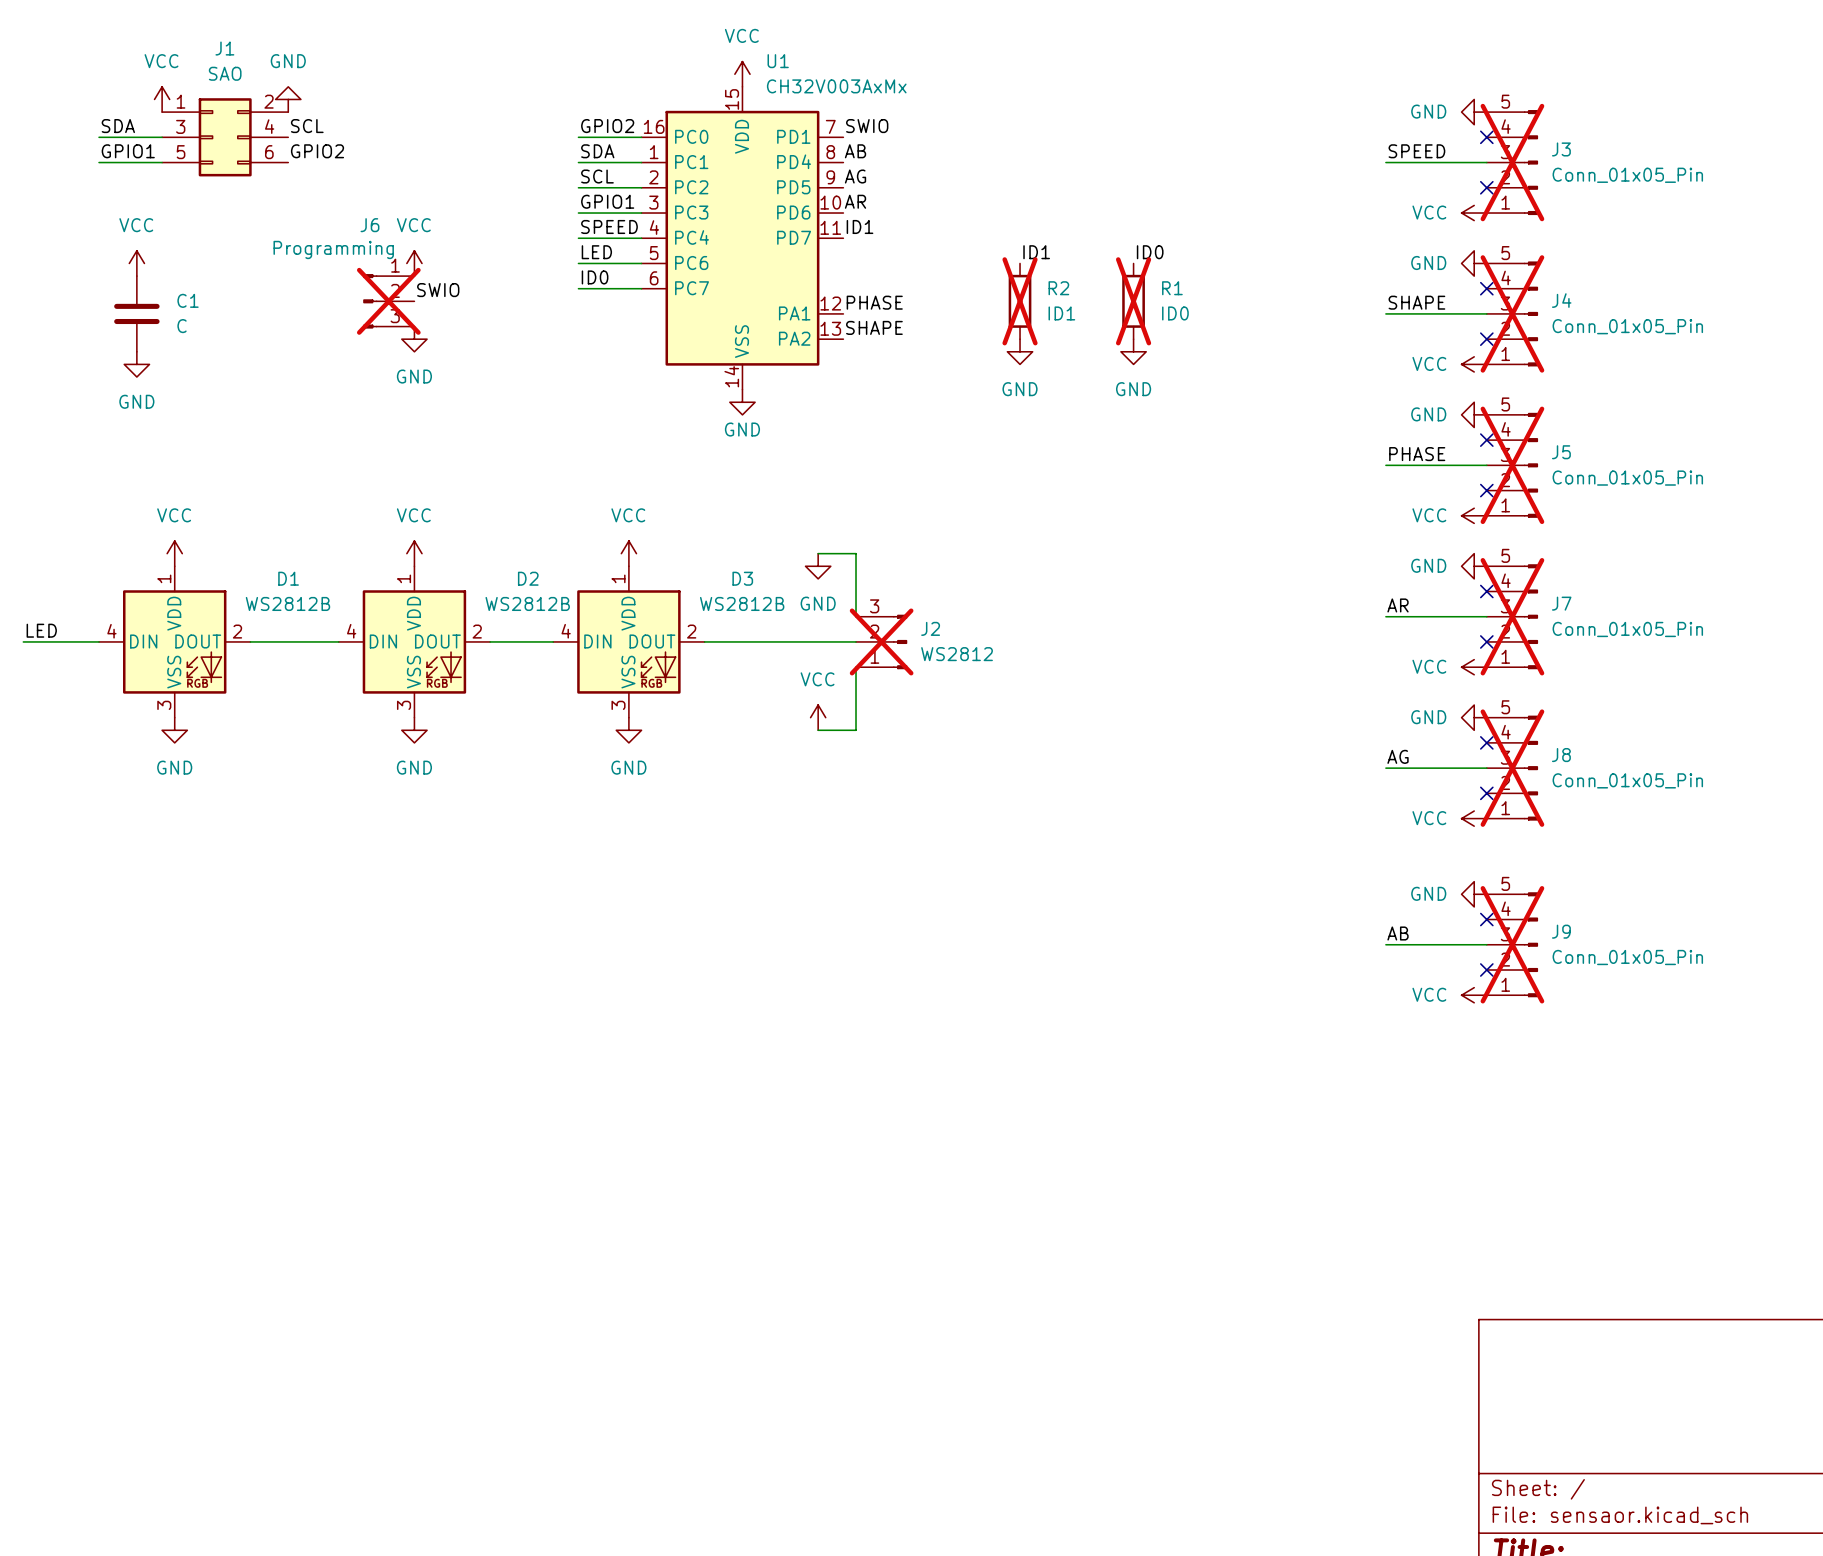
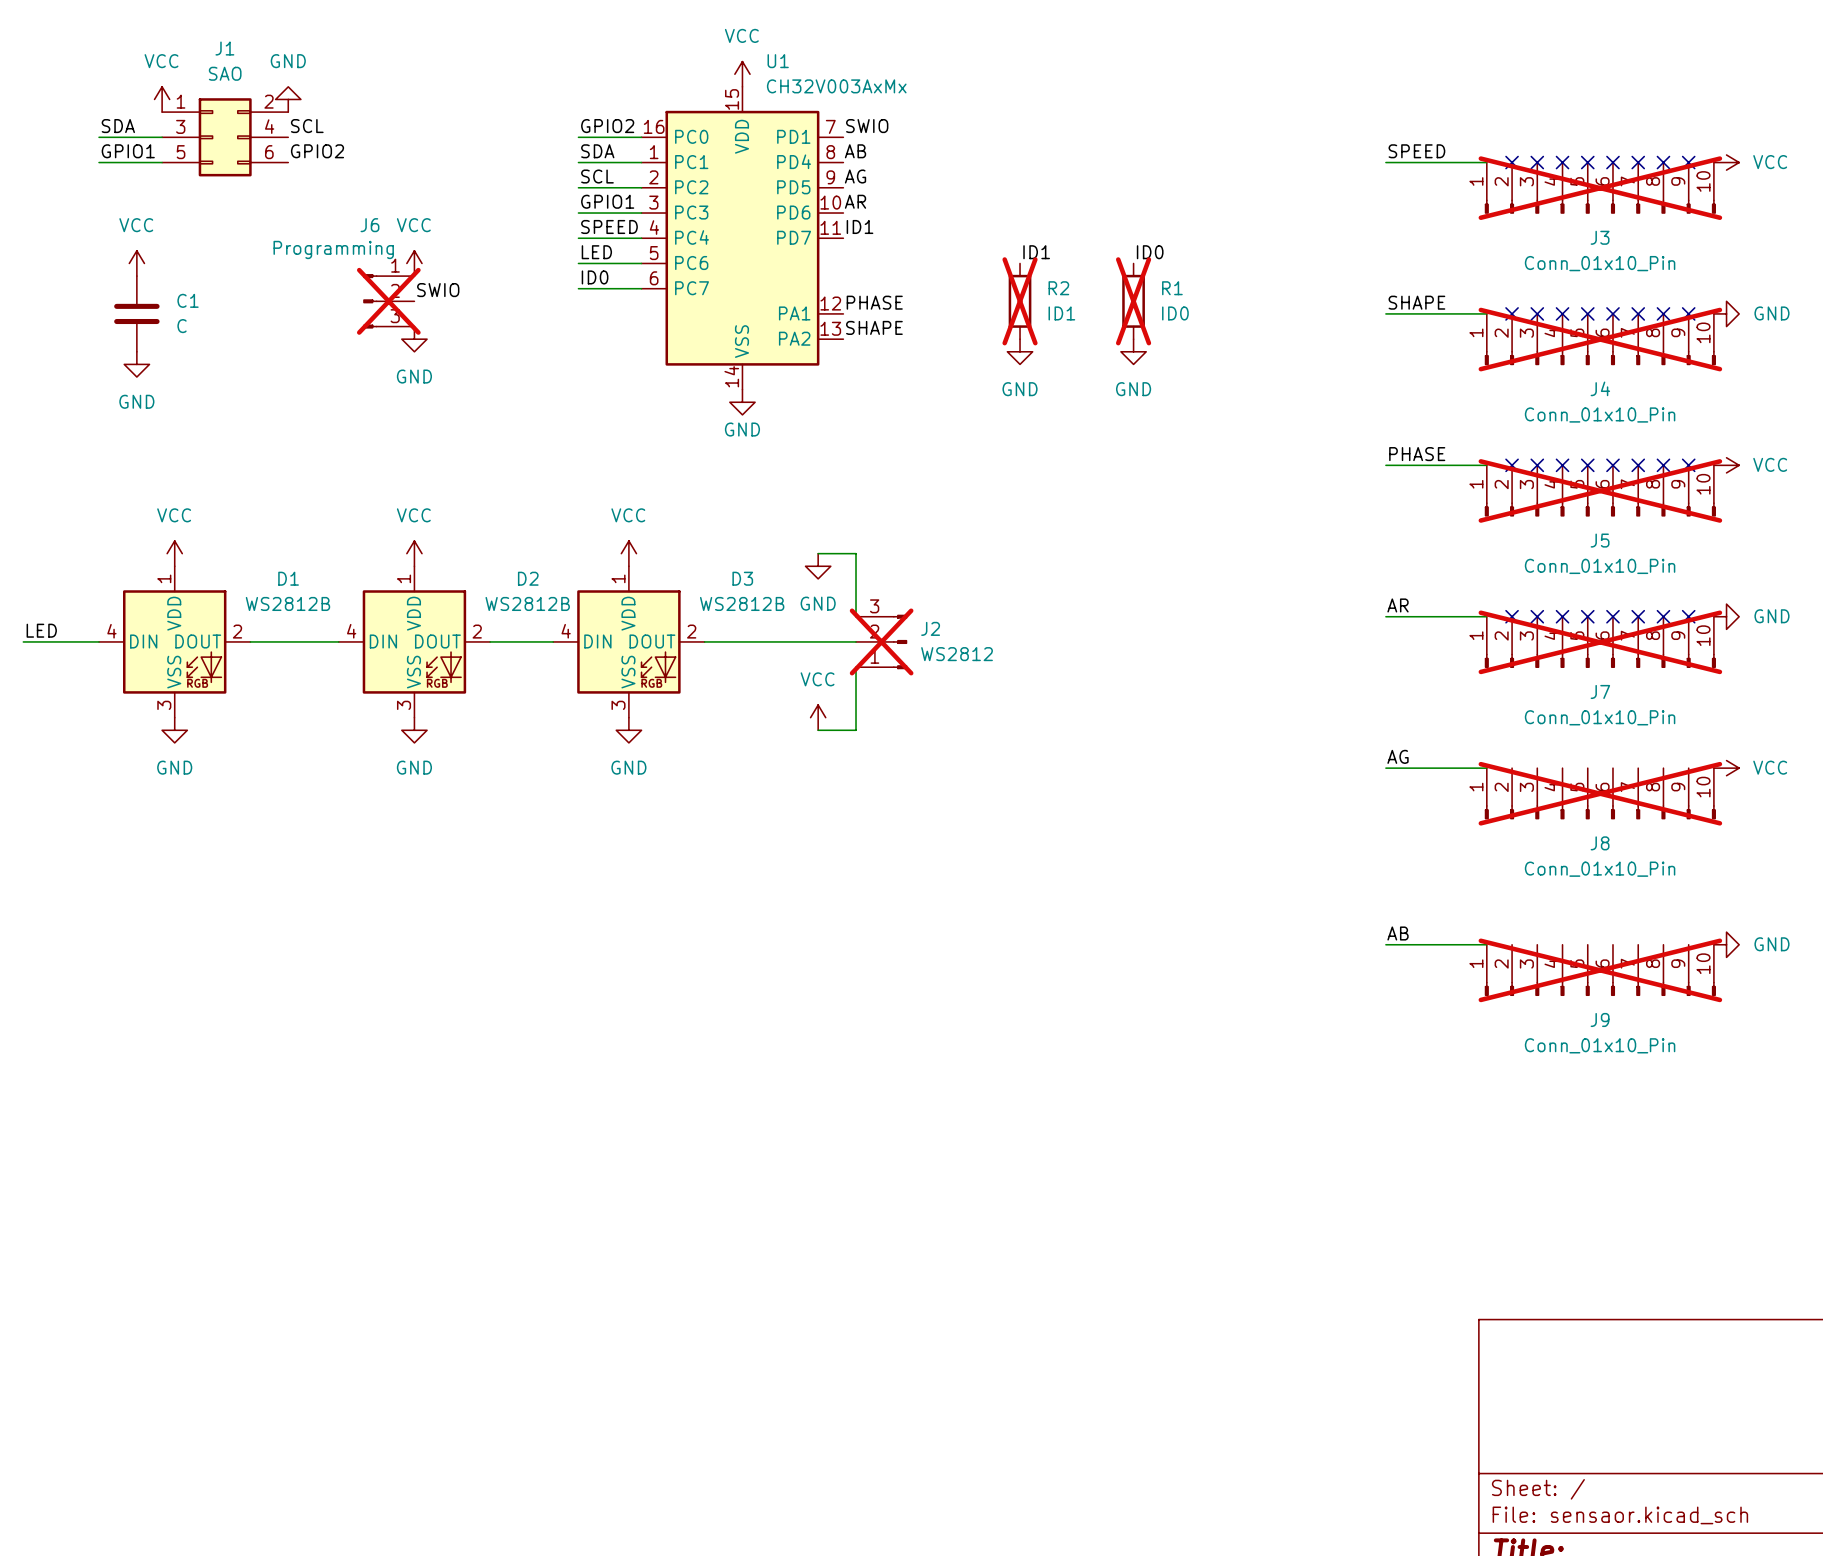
J3 symbol: [1486, 110, 1539, 216] -> [1484, 162, 1716, 214]
power symbol: GND (1474, 112) -> none
no-connect mark: (1486, 137) -> none
J3 name position: J3 (1561, 149) -> J3 (1600, 237)
no-connect mark: none -> (1512, 162)
no-connect mark: none -> (1537, 162)
no-connect mark: none -> (1562, 162)
no-connect mark: none -> (1587, 162)
no-connect mark: none -> (1612, 162)
no-connect mark: none -> (1638, 162)
no-connect mark: none -> (1663, 162)
no-connect mark: none -> (1688, 162)
power symbol: none -> VCC (1726, 162)
J3 value: Conn_01x05_Pin (1627, 175) -> Conn_01x10_Pin (1600, 263)
no-connect mark: (1486, 187) -> none
power symbol: VCC (1474, 213) -> none
J4 symbol: [1486, 261, 1539, 367] -> [1484, 313, 1716, 366]
power symbol: GND (1474, 263) -> none
no-connect mark: (1486, 288) -> none
J4 name position: J4 (1561, 300) -> J4 (1600, 388)
no-connect mark: none -> (1512, 313)
no-connect mark: none -> (1537, 313)
no-connect mark: none -> (1562, 313)
no-connect mark: none -> (1587, 313)
no-connect mark: none -> (1612, 313)
no-connect mark: none -> (1638, 313)
no-connect mark: none -> (1663, 313)
no-connect mark: none -> (1688, 313)
power symbol: none -> GND (1726, 313)
J4 value: Conn_01x05_Pin (1627, 326) -> Conn_01x10_Pin (1600, 415)
no-connect mark: (1486, 339) -> none
power symbol: VCC (1474, 364) -> none
J5 symbol: [1486, 412, 1539, 518] -> [1484, 465, 1716, 517]
power symbol: GND (1474, 414) -> none
no-connect mark: (1486, 440) -> none
J5 name position: J5 (1561, 452) -> J5 (1600, 540)
no-connect mark: none -> (1512, 465)
no-connect mark: none -> (1537, 465)
no-connect mark: none -> (1562, 465)
no-connect mark: none -> (1587, 465)
no-connect mark: none -> (1612, 465)
no-connect mark: none -> (1638, 465)
no-connect mark: none -> (1663, 465)
no-connect mark: none -> (1688, 465)
power symbol: none -> VCC (1726, 465)
J5 value: Conn_01x05_Pin (1627, 478) -> Conn_01x10_Pin (1600, 566)
no-connect mark: (1486, 490) -> none
power symbol: VCC (1474, 515) -> none
J7 symbol: [1486, 564, 1539, 670] -> [1484, 616, 1716, 668]
power symbol: GND (1474, 566) -> none
no-connect mark: (1486, 591) -> none
J7 name position: J7 (1561, 603) -> J7 (1600, 691)
no-connect mark: none -> (1512, 616)
no-connect mark: none -> (1537, 616)
no-connect mark: none -> (1562, 616)
no-connect mark: none -> (1587, 616)
no-connect mark: none -> (1612, 616)
no-connect mark: none -> (1638, 616)
no-connect mark: none -> (1663, 616)
no-connect mark: none -> (1688, 616)
power symbol: none -> GND (1726, 616)
J7 value: Conn_01x05_Pin (1627, 629) -> Conn_01x10_Pin (1600, 717)
no-connect mark: (1486, 641) -> none
power symbol: VCC (1474, 667) -> none
J8 symbol: [1486, 715, 1539, 821] -> [1484, 768, 1716, 820]
power symbol: GND (1474, 717) -> none
no-connect mark: (1486, 742) -> none
J8 name position: J8 (1561, 755) -> J8 (1600, 843)
power symbol: none -> VCC (1726, 768)
J8 value: Conn_01x05_Pin (1627, 780) -> Conn_01x10_Pin (1600, 869)
no-connect mark: (1486, 793) -> none
power symbol: VCC (1474, 818) -> none
J9 symbol: [1486, 892, 1539, 998] -> [1484, 944, 1716, 996]
power symbol: GND (1474, 894) -> none
no-connect mark: (1486, 919) -> none
J9 name position: J9 (1561, 931) -> J9 (1600, 1019)
power symbol: none -> GND (1726, 944)
J9 value: Conn_01x05_Pin (1627, 957) -> Conn_01x10_Pin (1600, 1045)
no-connect mark: (1486, 969) -> none
power symbol: VCC (1474, 995) -> none

